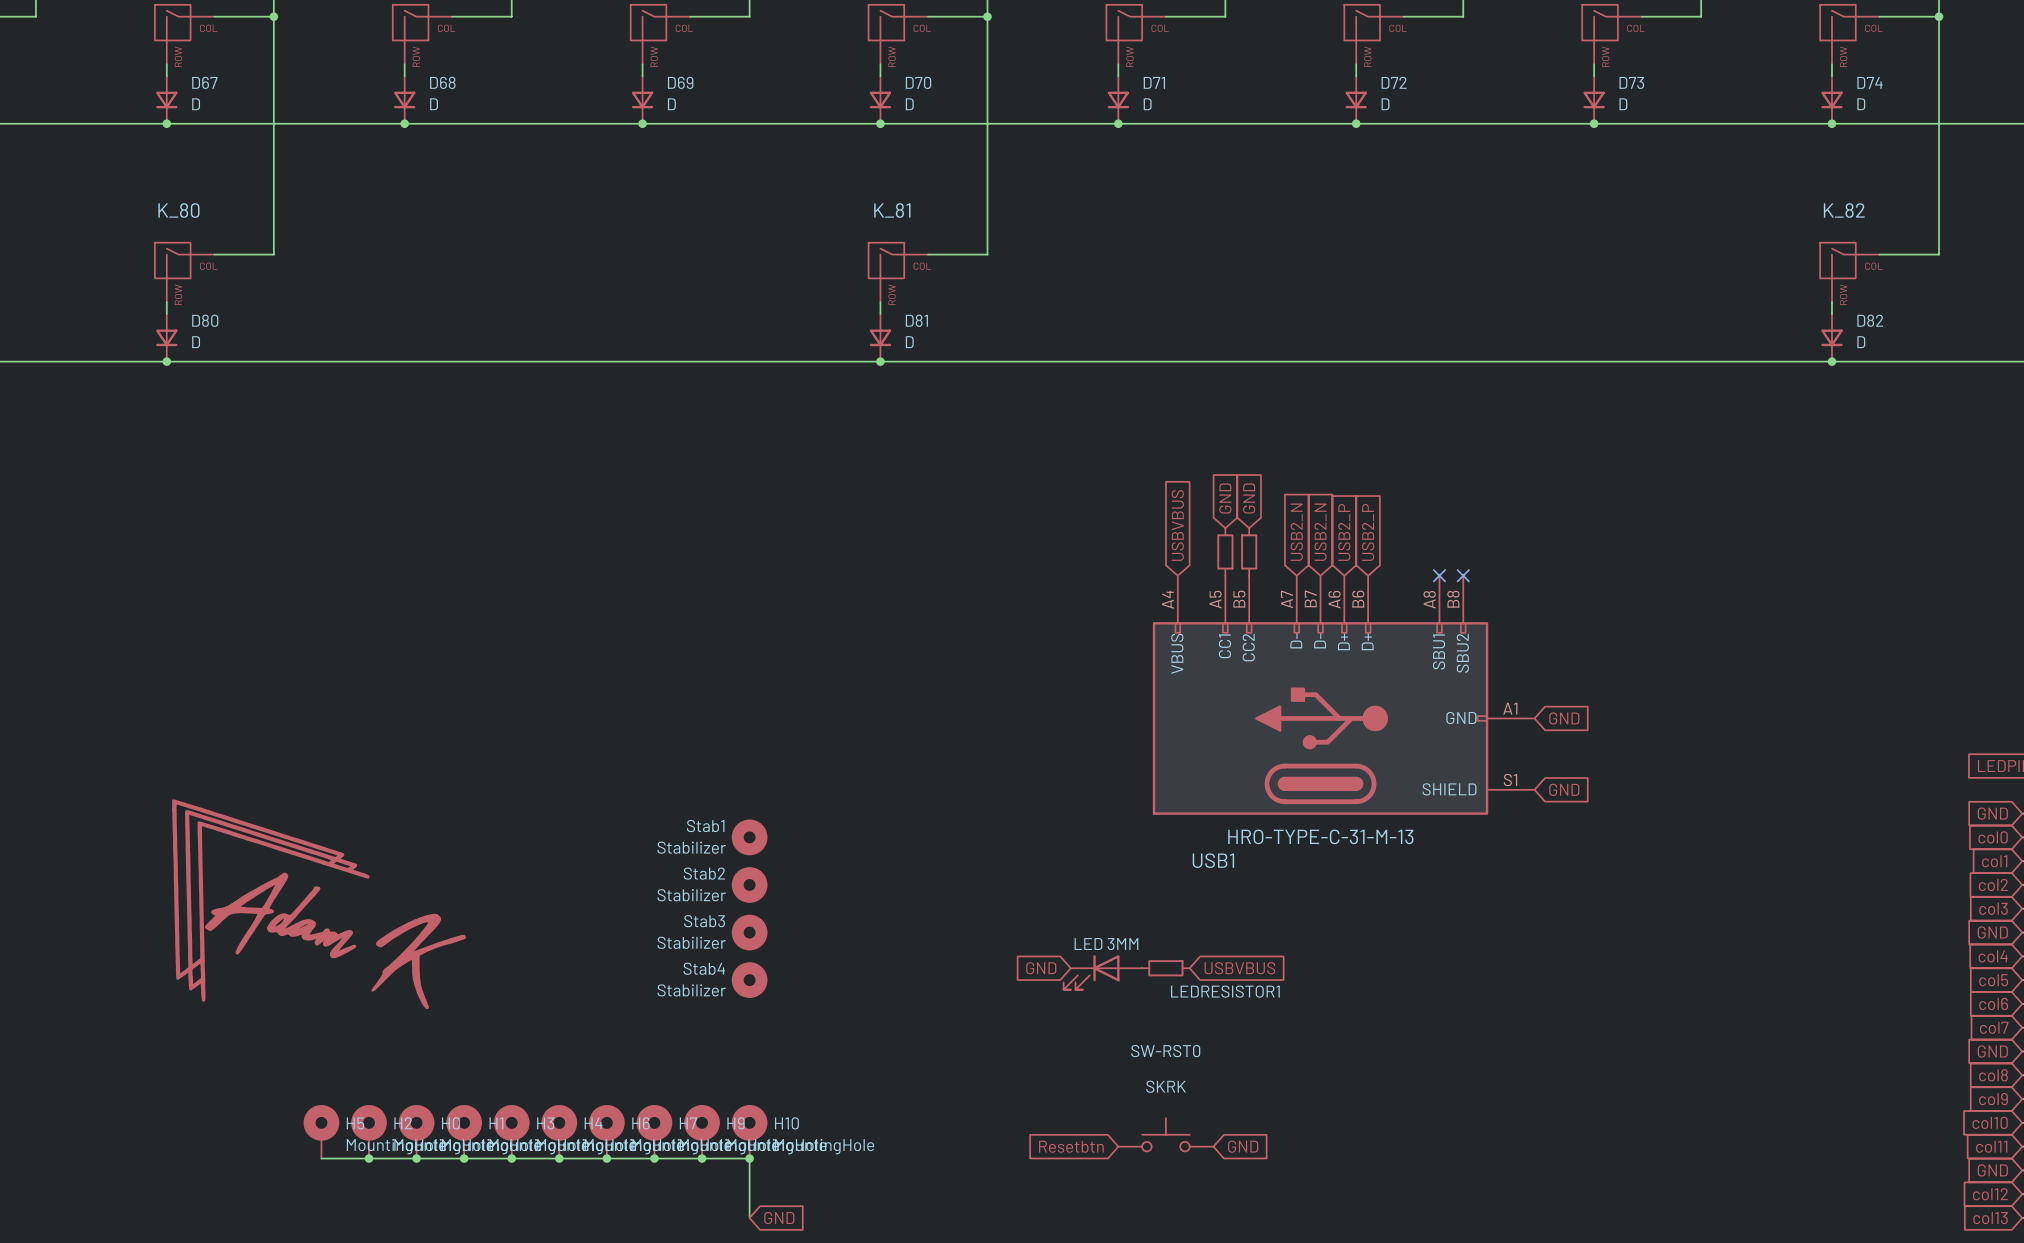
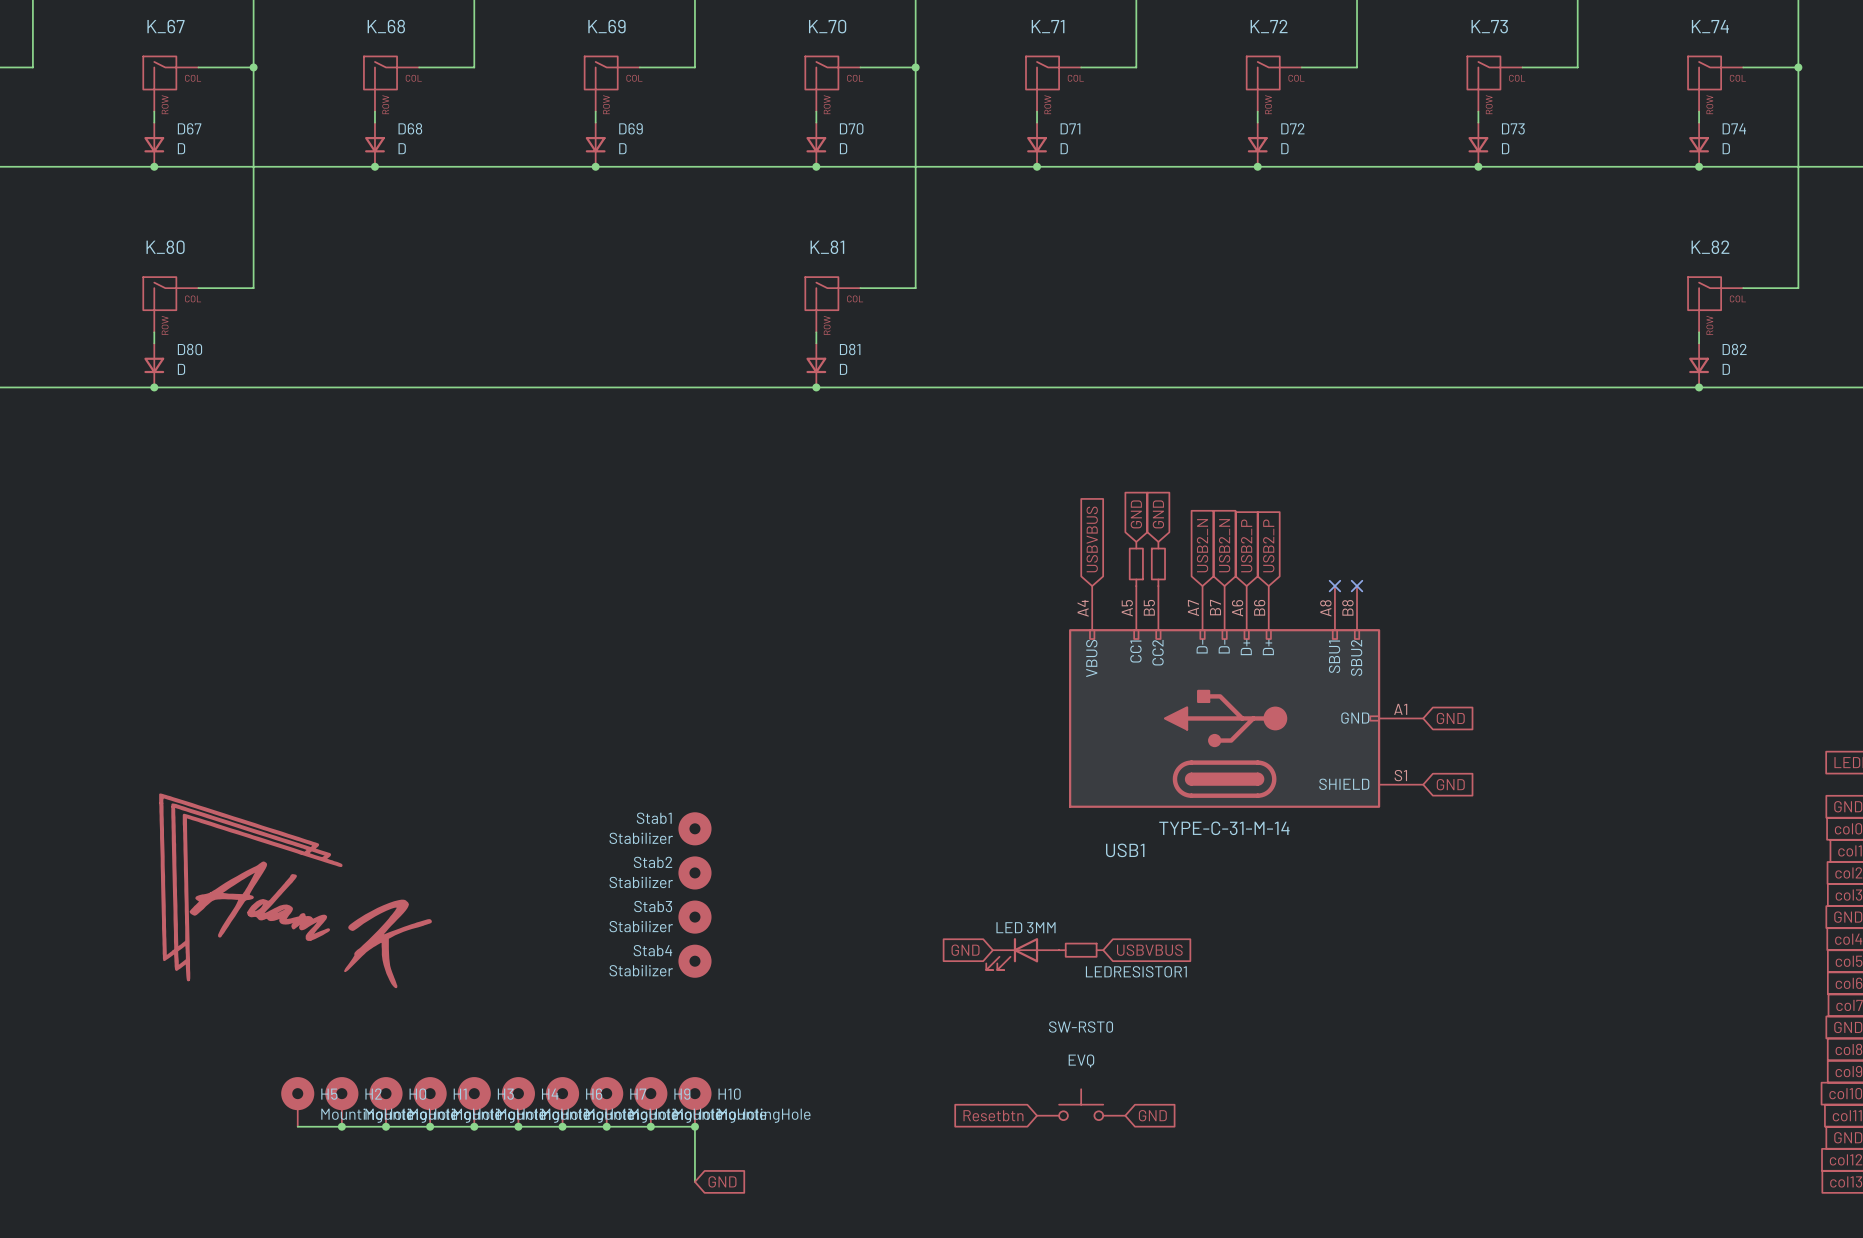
USB1 value: HRO-TYPE-C-31-M-13 (1320, 836) -> TYPE-C-31-M-14 (1224, 828)
SW-RST0 value: SKRK (1166, 1086) -> EVQ (1081, 1060)

